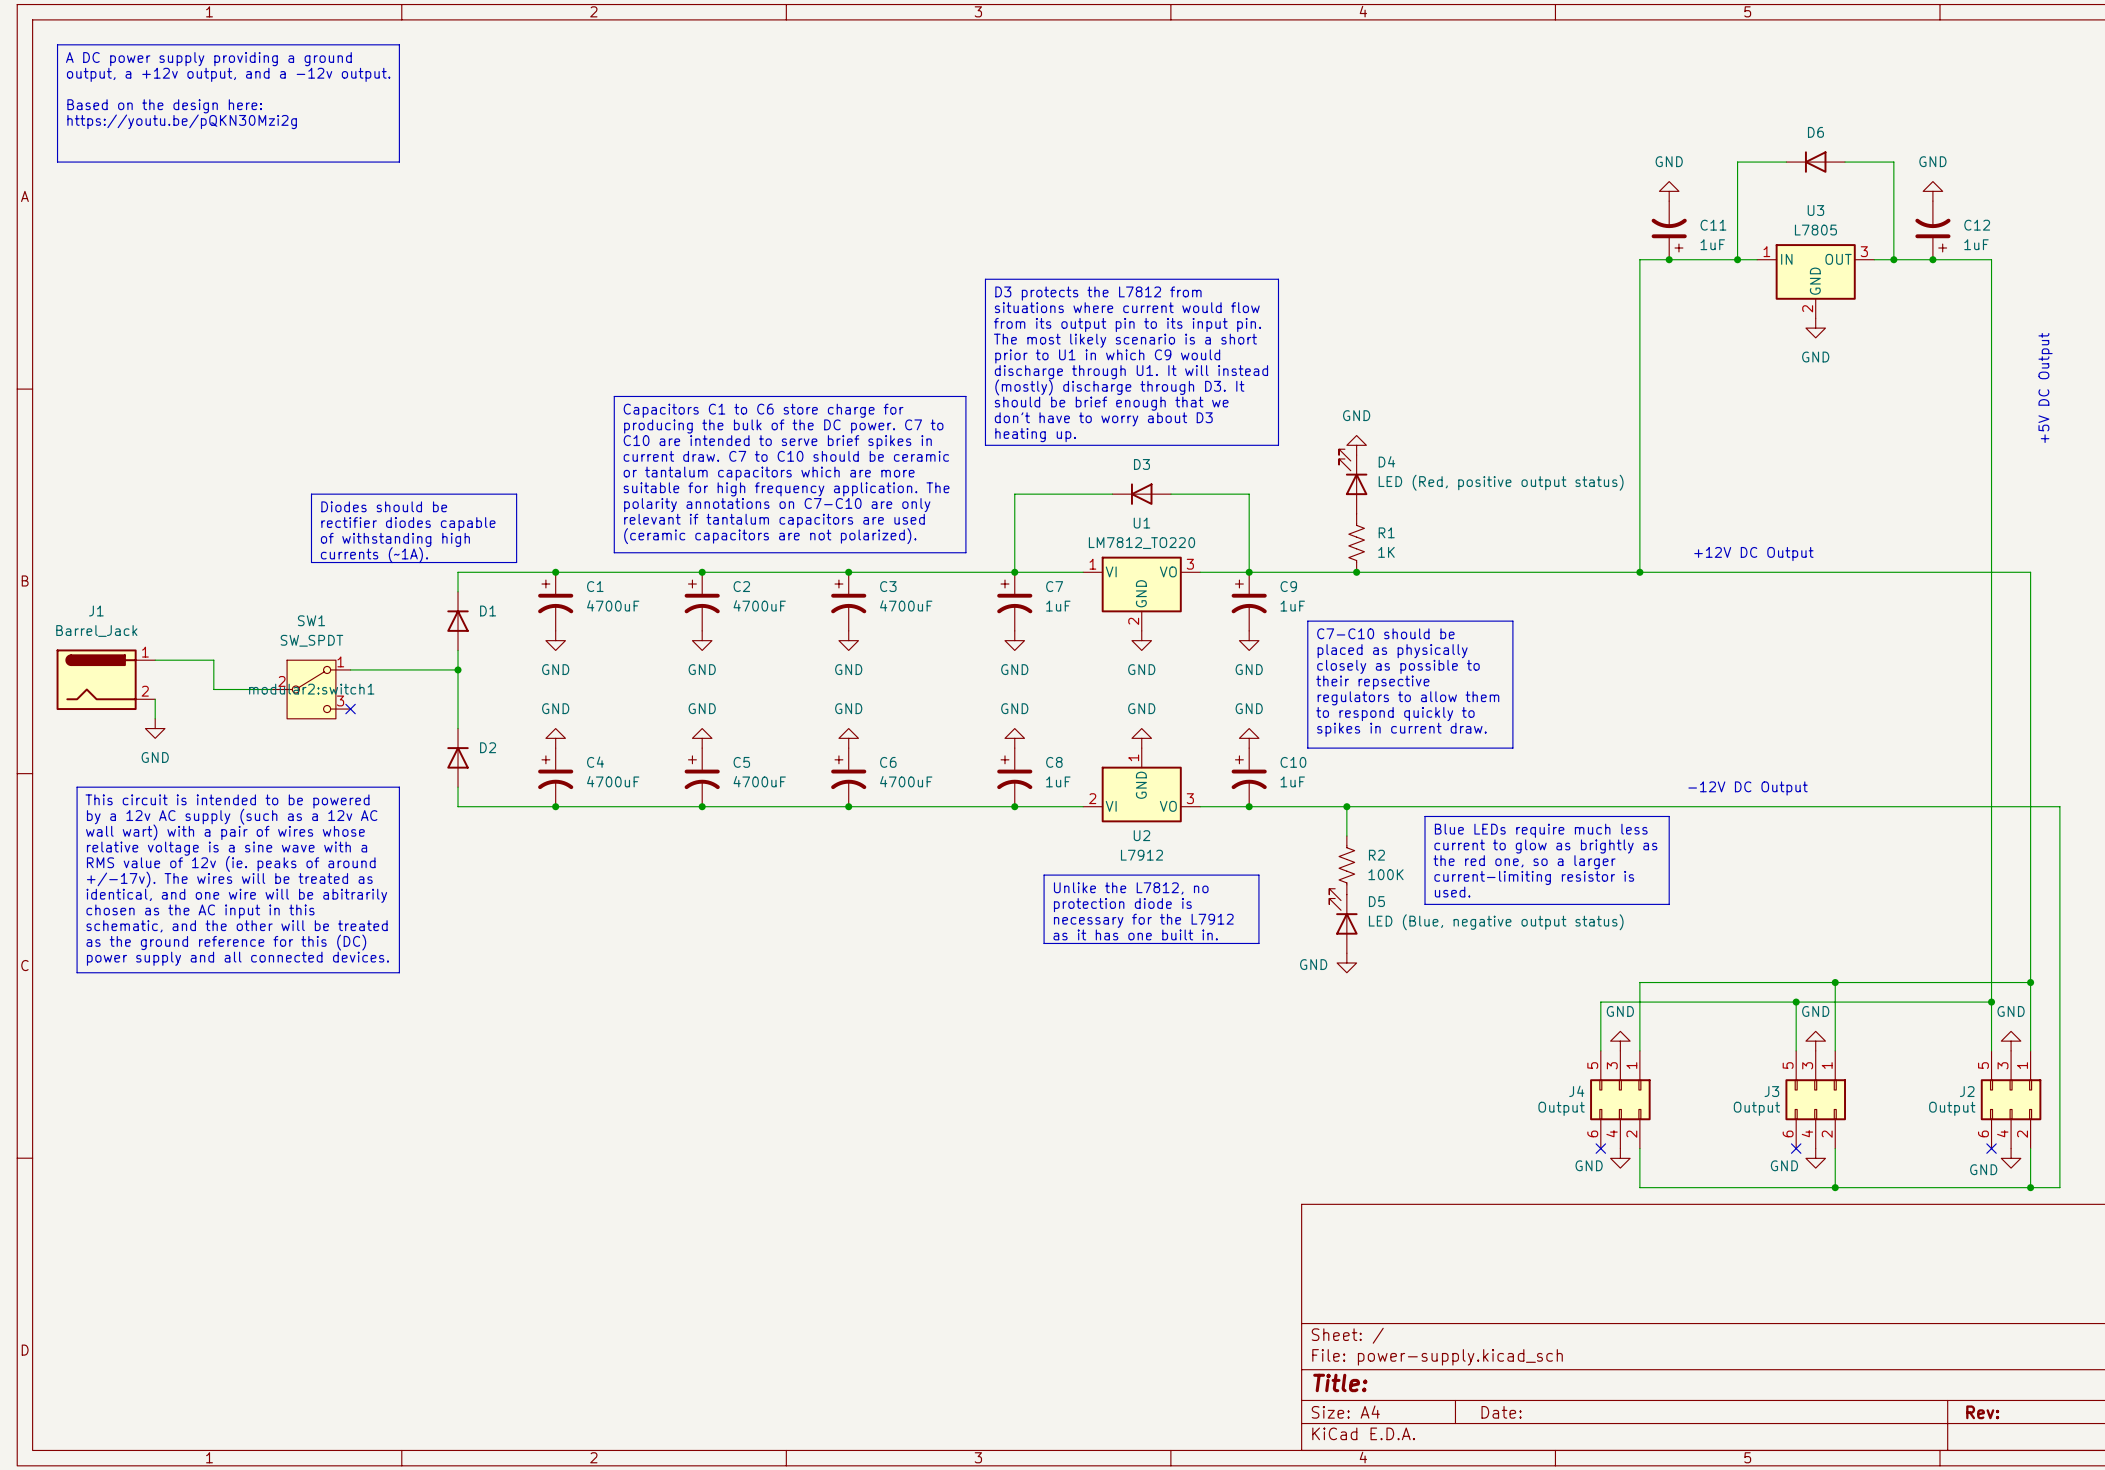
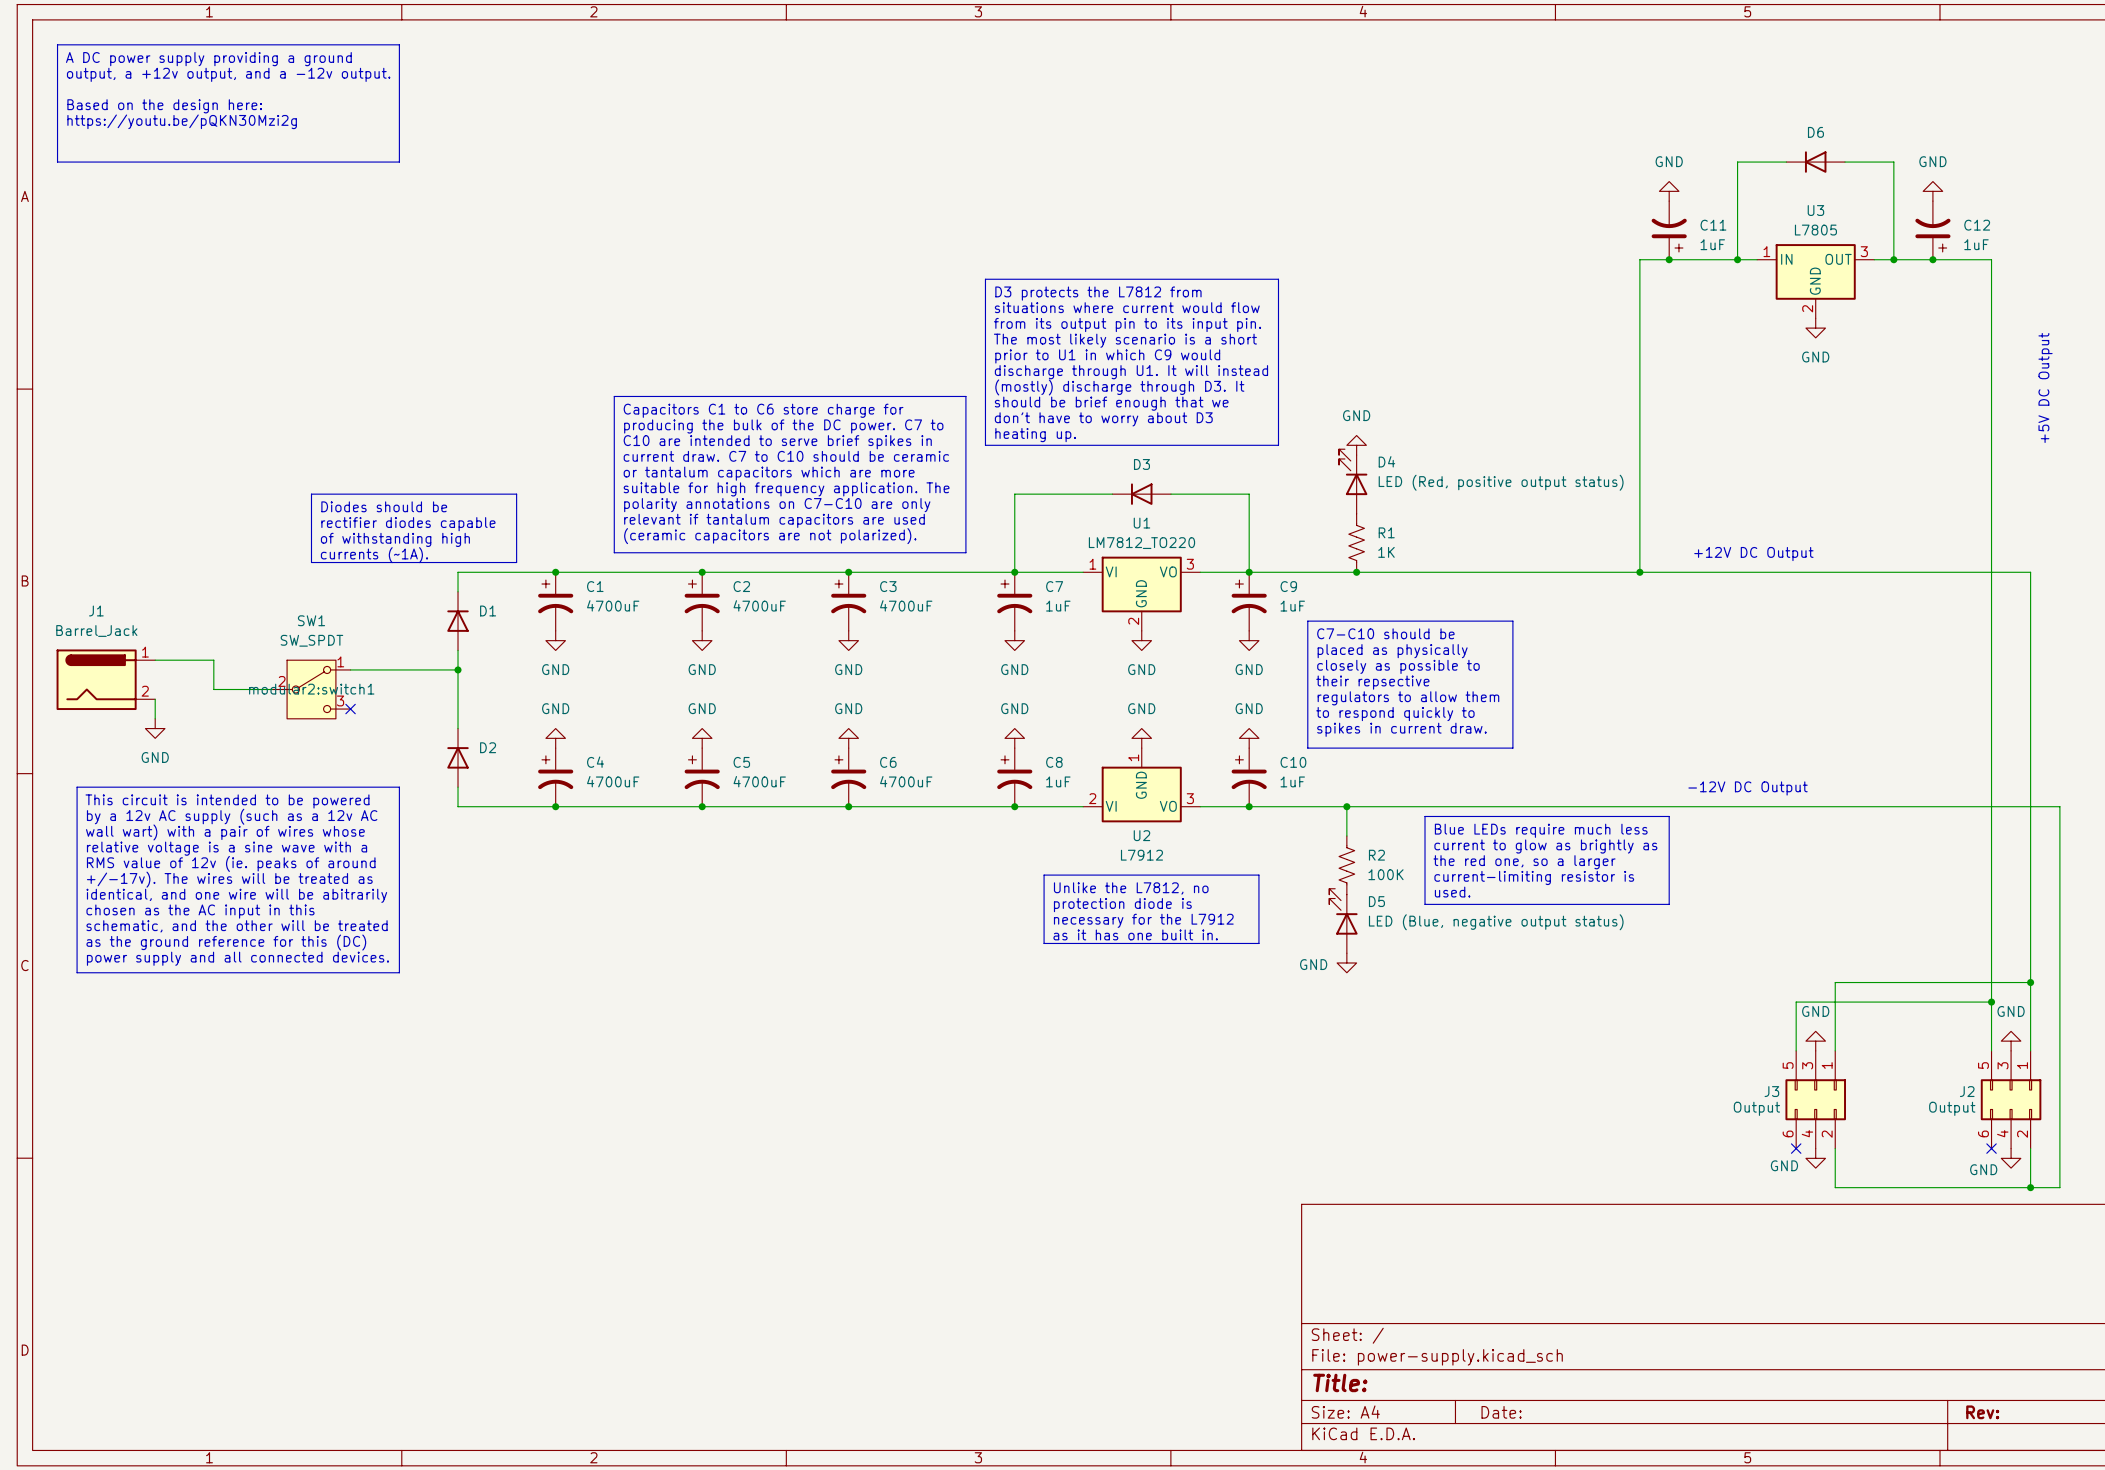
wire: (1835, 982) (1639, 982) (1639, 1050) -> none
junction: (1835, 982) -> none
wire: (1796, 1002) (1600, 1002) (1600, 1050) -> none
junction: (1796, 1002) -> none
power symbol: GND (1620, 1041) -> none
J4: Output (1620, 1099) -> none
no-connect mark: (1600, 1148) -> none
wire: (1639, 1148) (1639, 1187) (1835, 1187) -> none
power symbol: GND (1620, 1158) -> none
junction: (1835, 1187) -> none

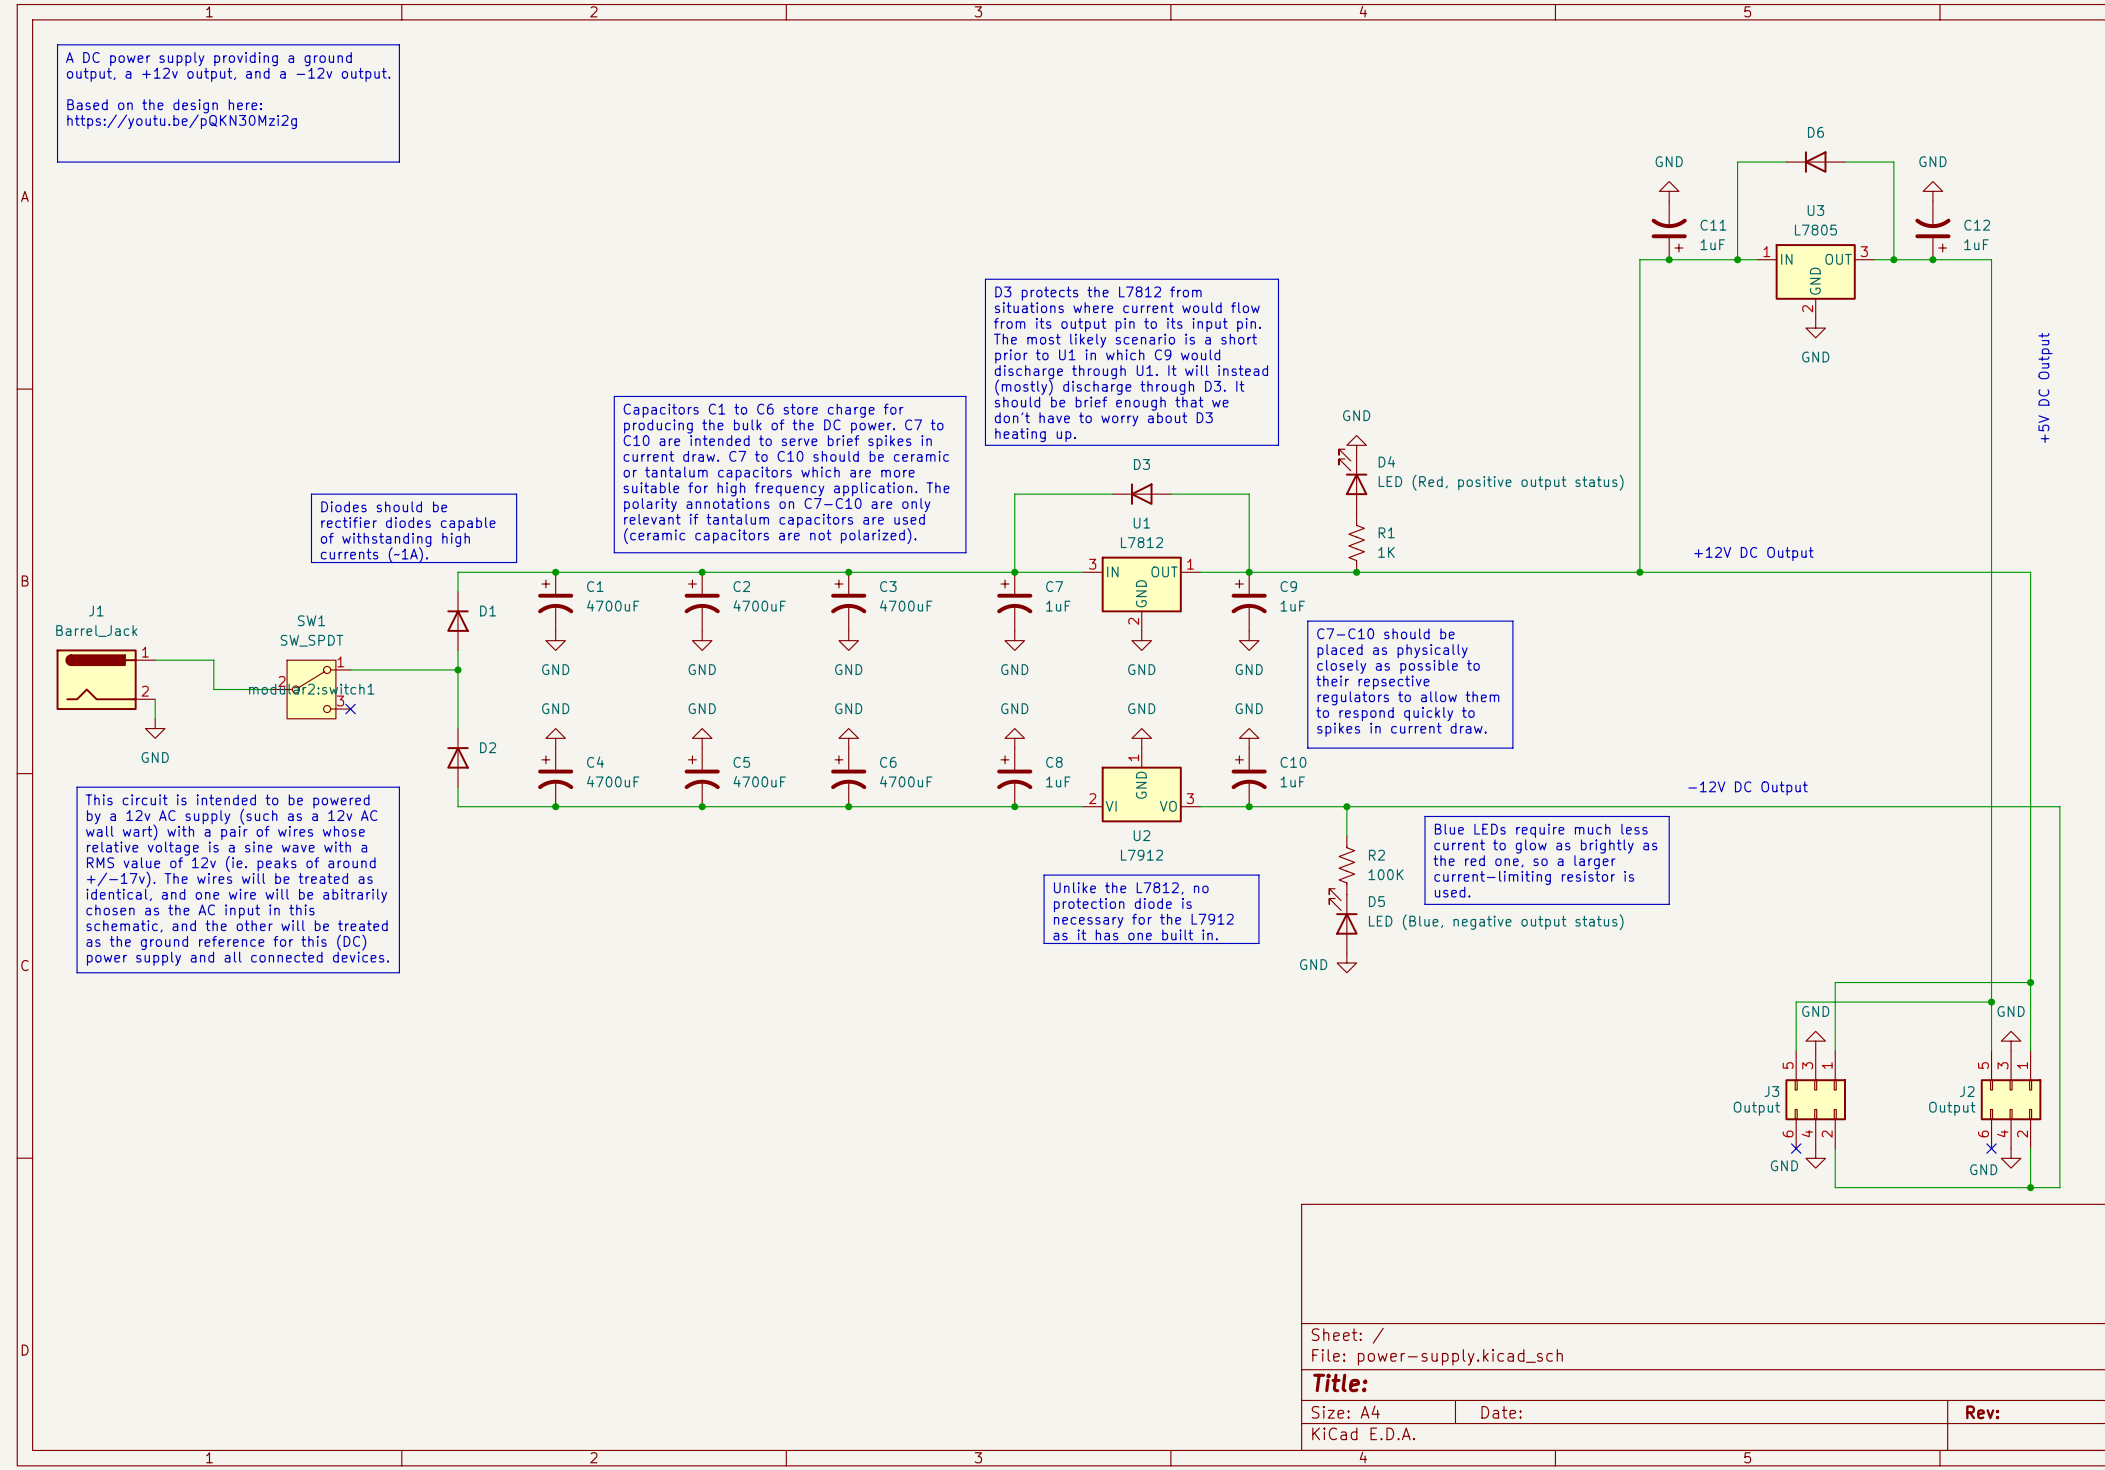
U1 value: LM7812_TO220 (1141, 543) -> L7812 (1141, 542)
U1 pin number: 1 (1092, 564) -> 3 (1092, 564)
U1 pin number: 3 (1190, 564) -> 1 (1190, 564)
U1 pin name: VI (1111, 571) -> IN (1112, 571)
U1 pin name: VO (1168, 571) -> OUT (1164, 571)

